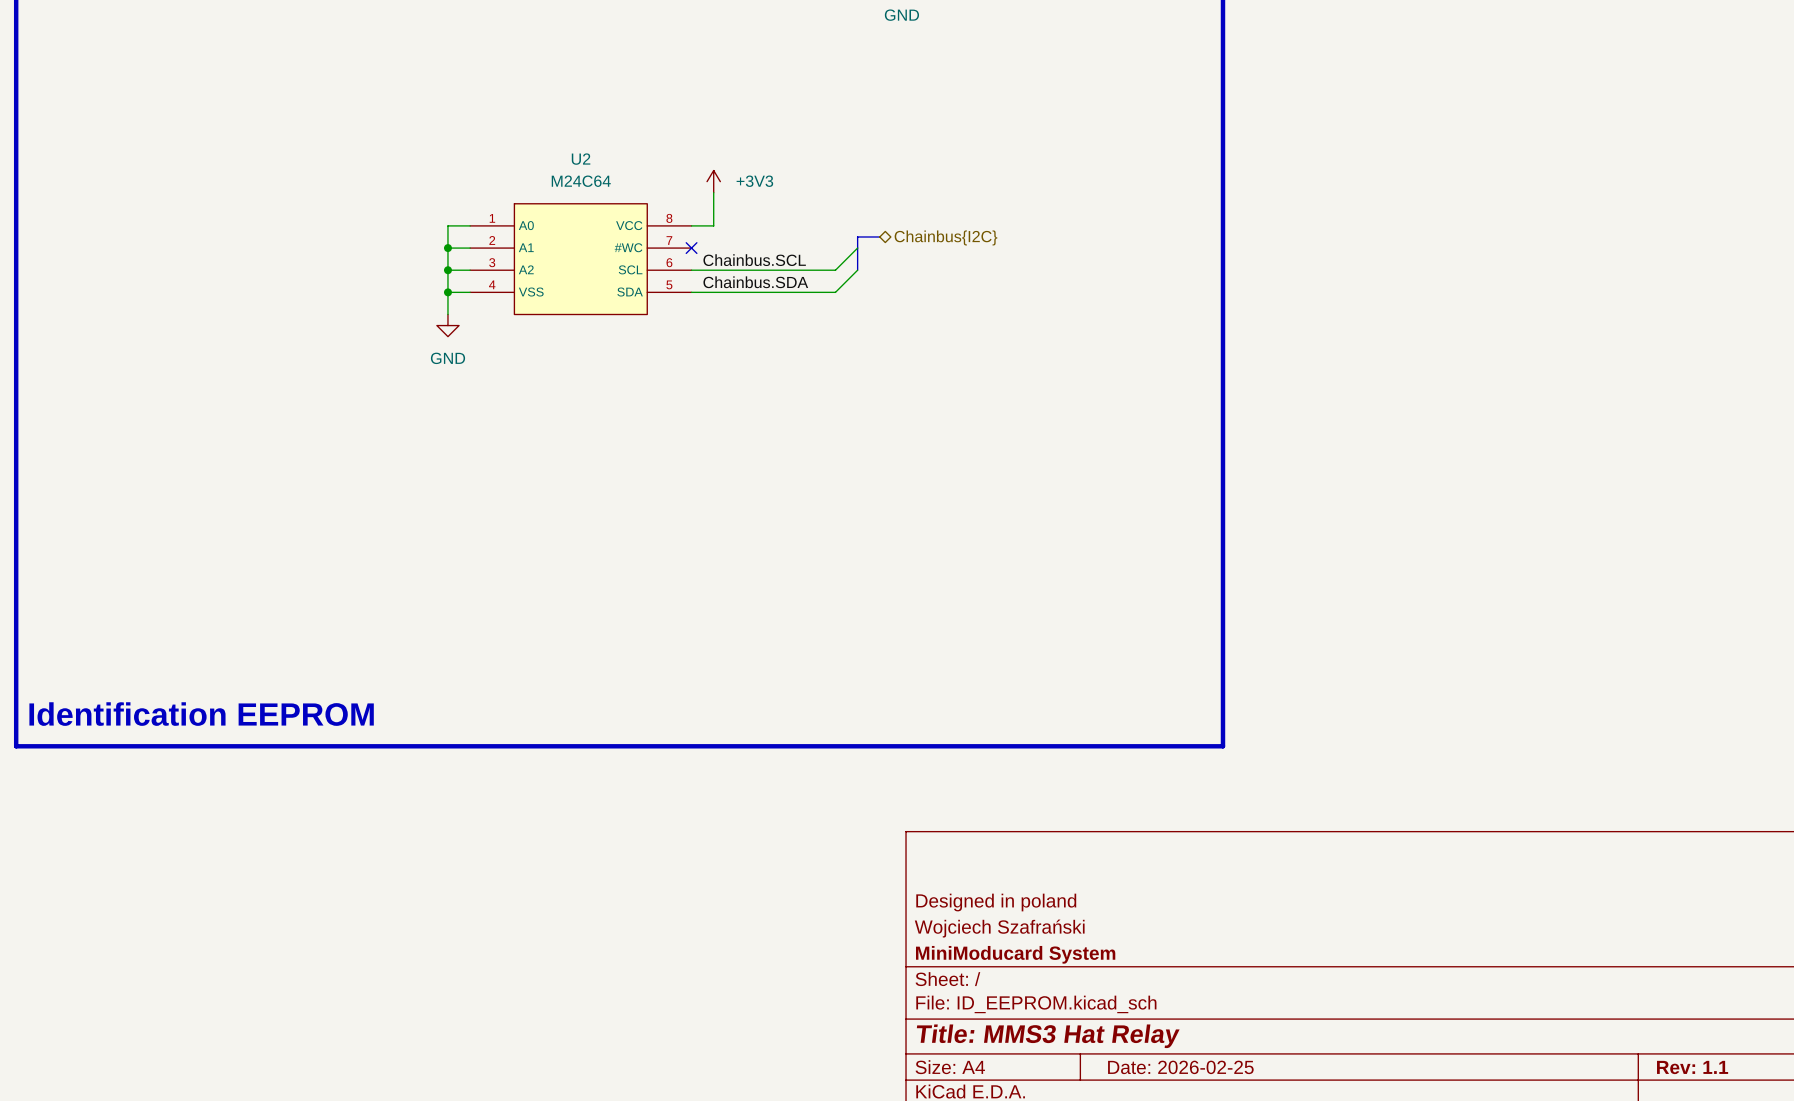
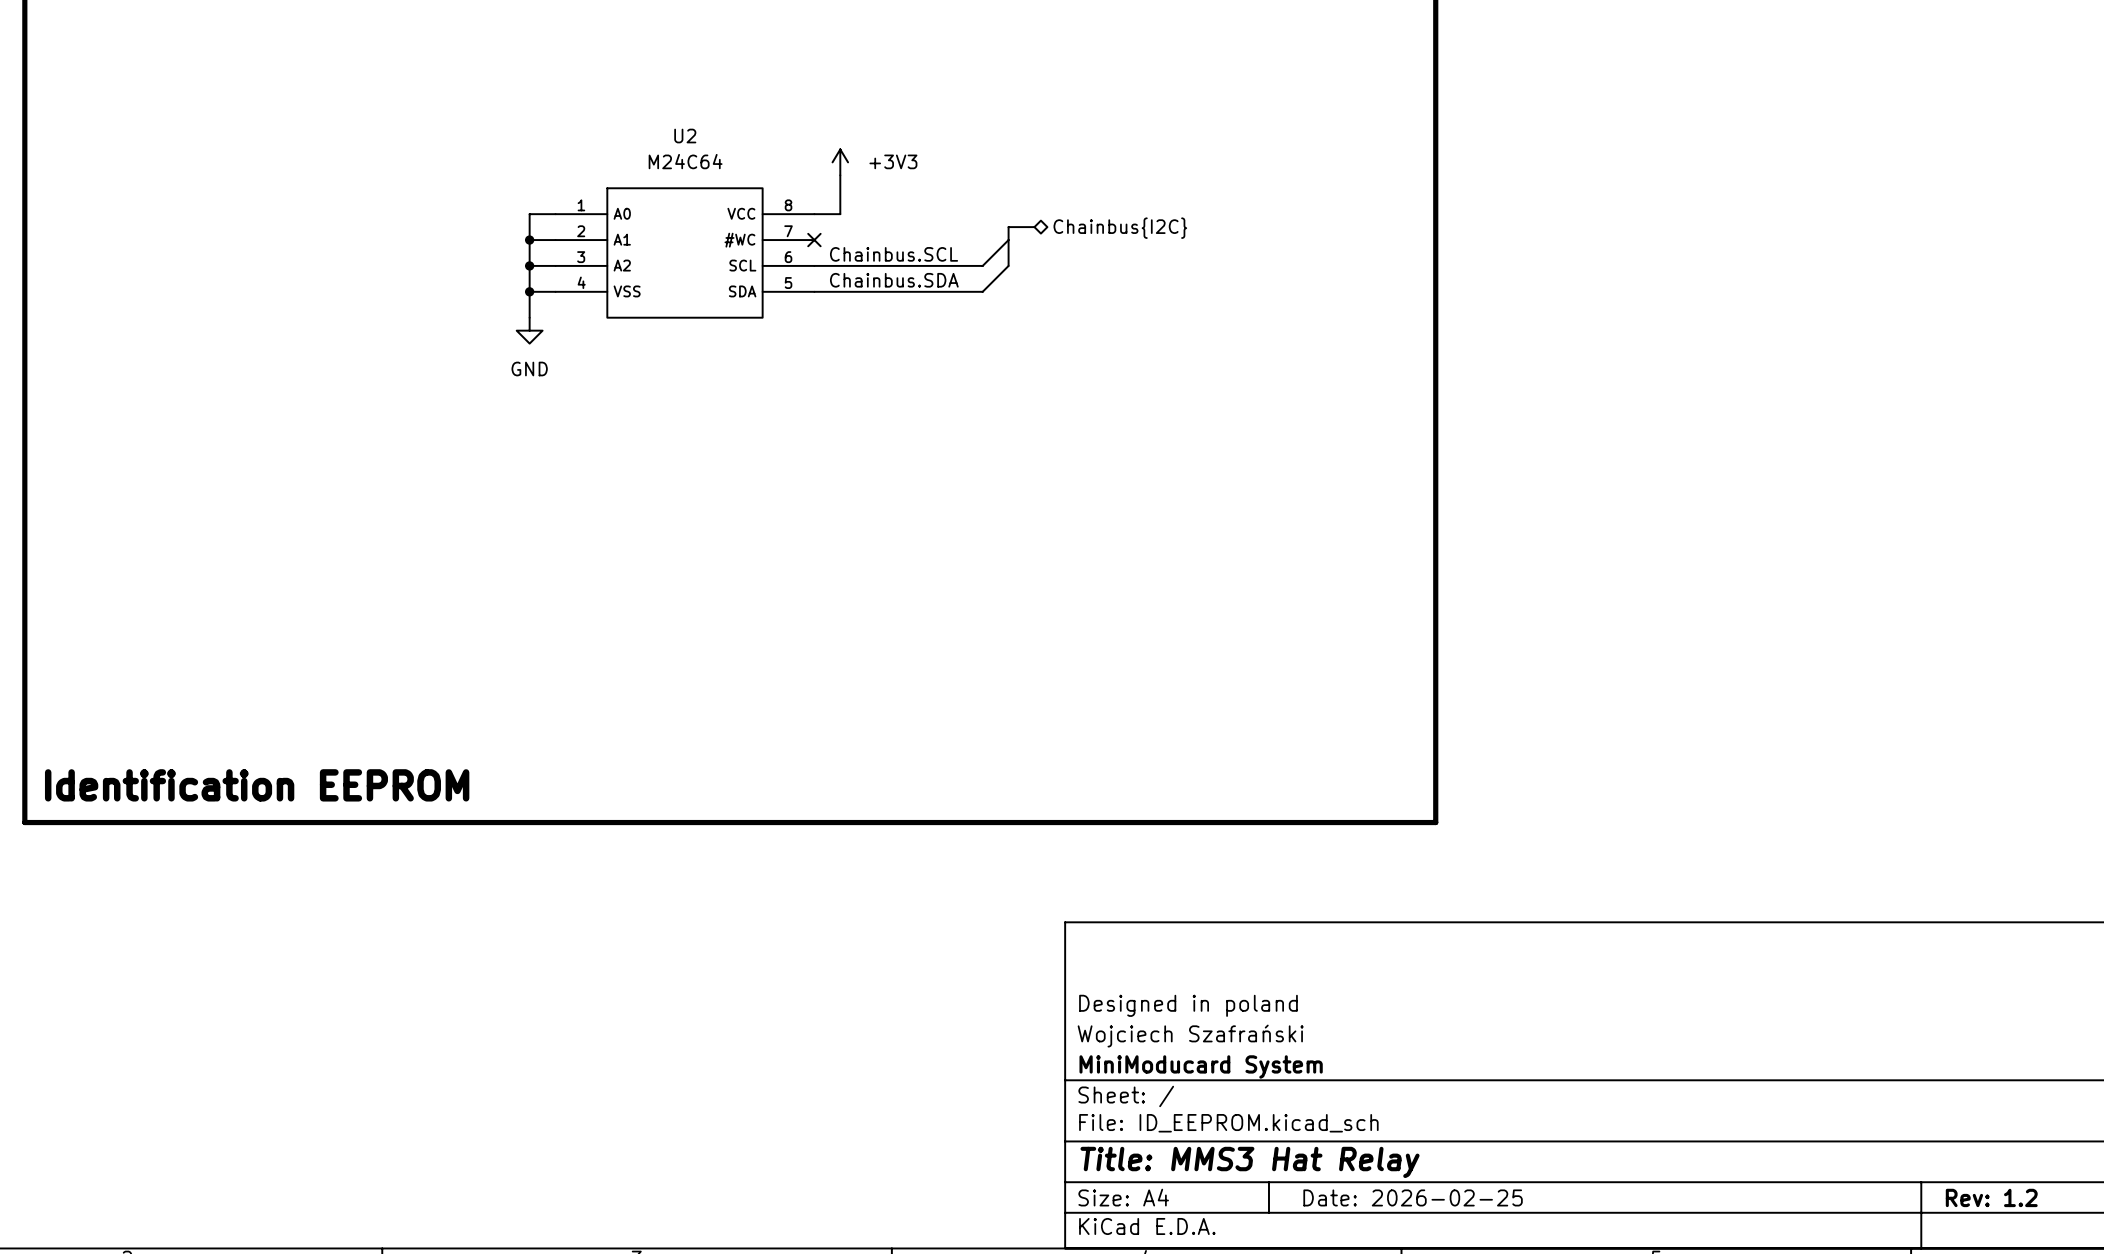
title block: Rev: 1.1 (1692, 1067) -> Rev: 1.2 (1991, 1197)

